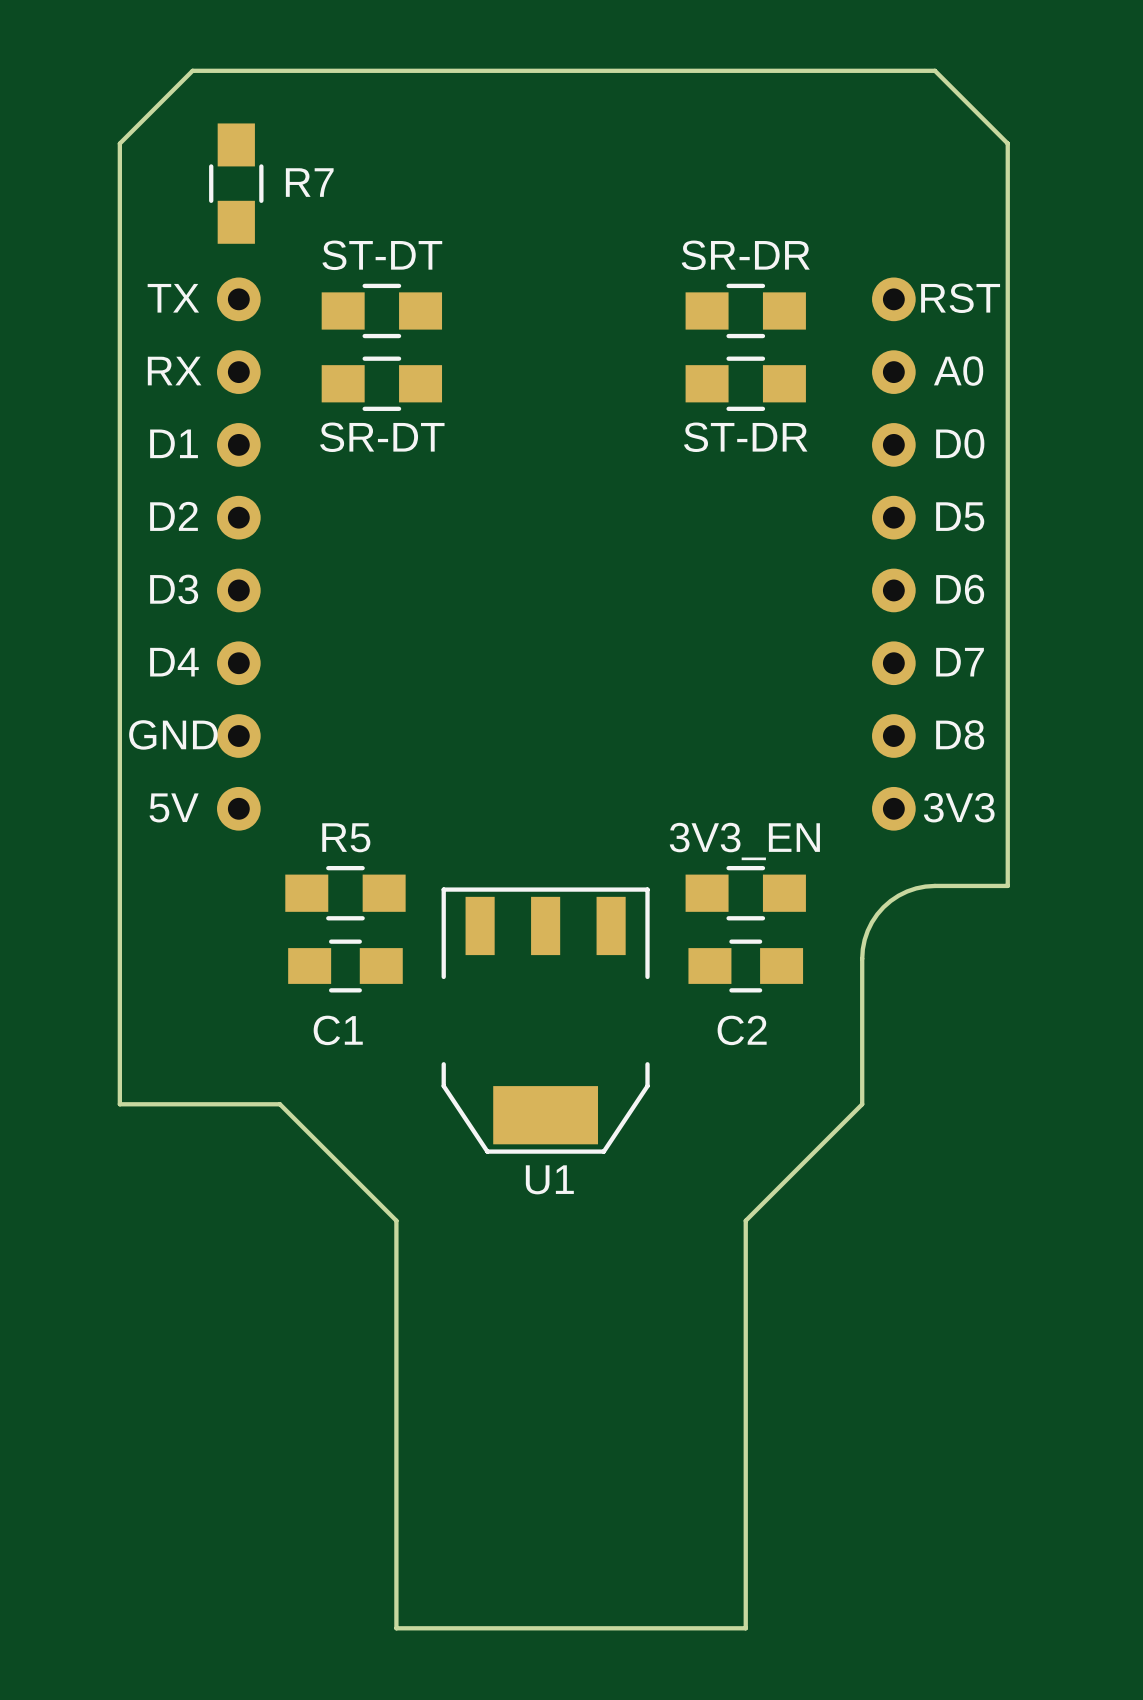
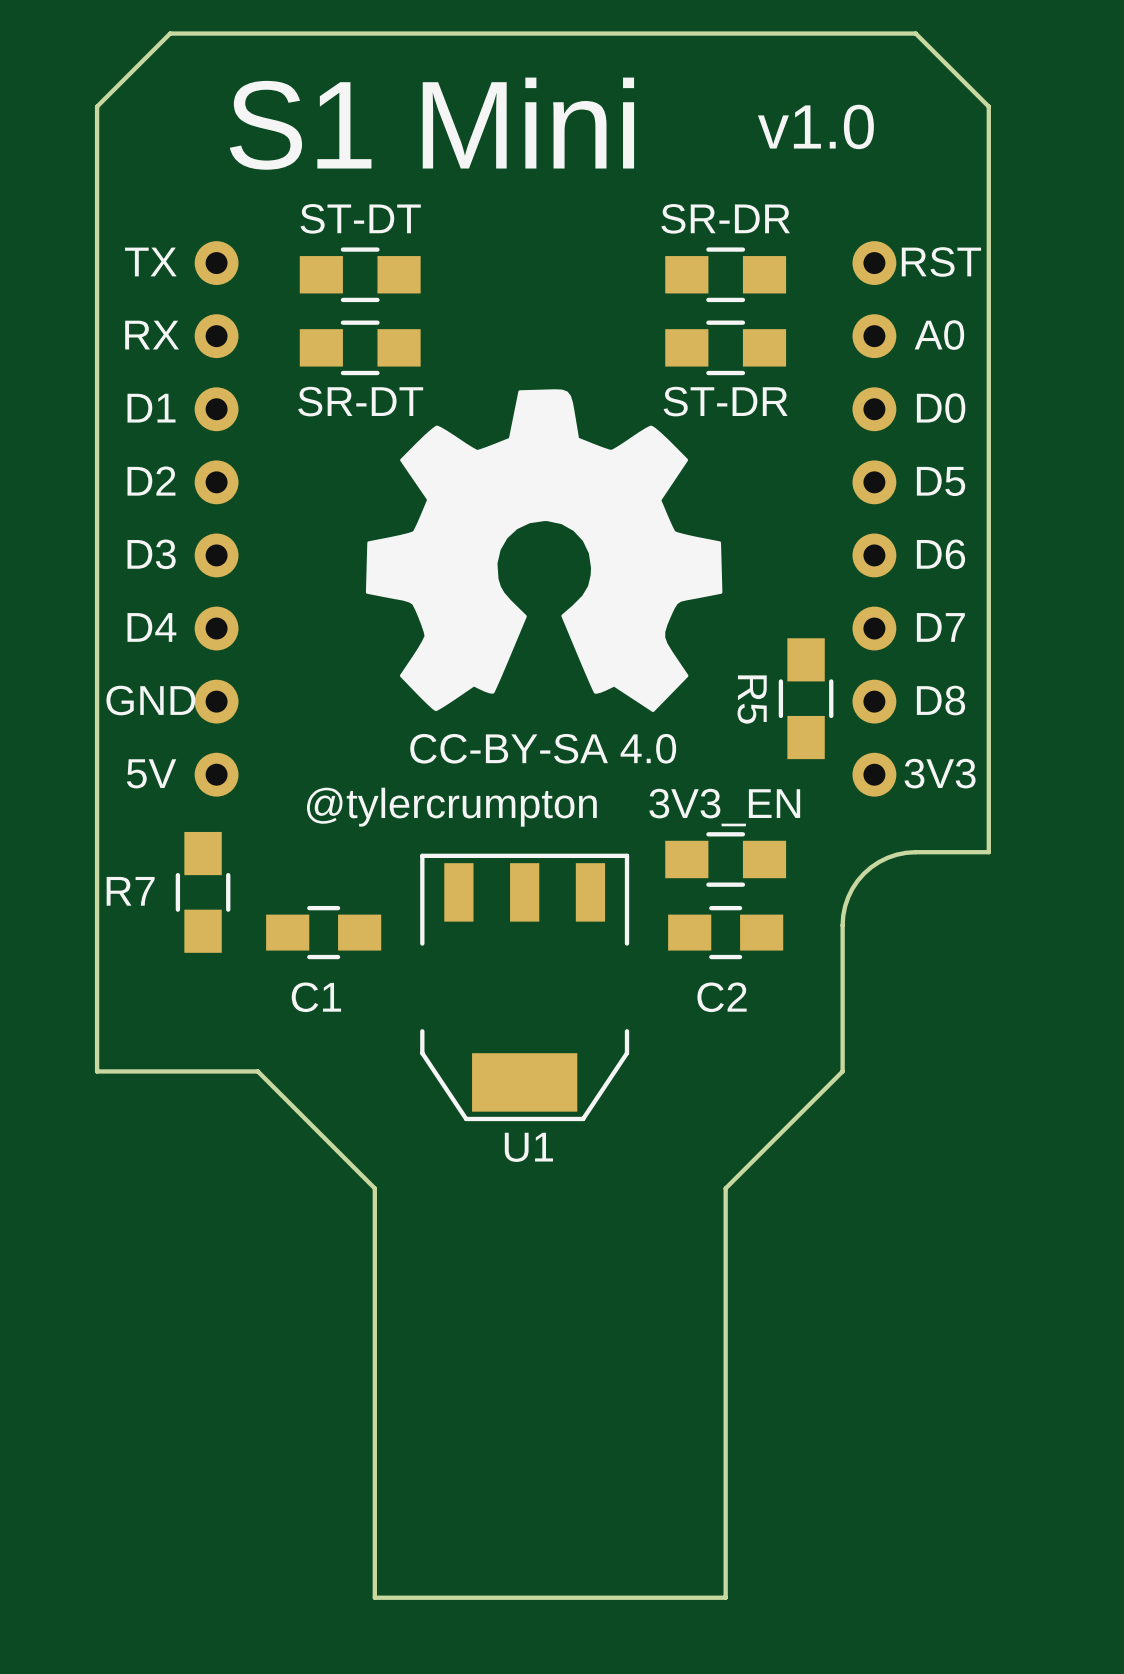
text: none -> S1 Mini (431, 123)
text: none -> v1.0 (815, 126)
R7 name position: R7 (309, 182) -> R7 (130, 891)
R7 position: (236, 183) -> (203, 892)
drawing: none -> [365, 389, 723, 713]
text: none -> CC-BY-SA 4.0 (543, 748)
R5 name position: R5 (346, 837) -> R5 (752, 699)
text: none -> @tylercrumpton (451, 807)
R5 rotation: 0° (345, 893) -> 90° clockwise (806, 698)
R5 position: (345, 893) -> (806, 698)

